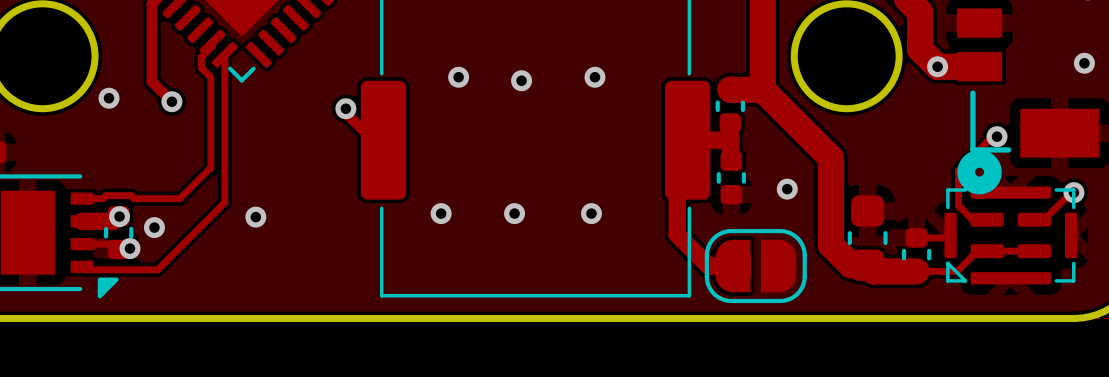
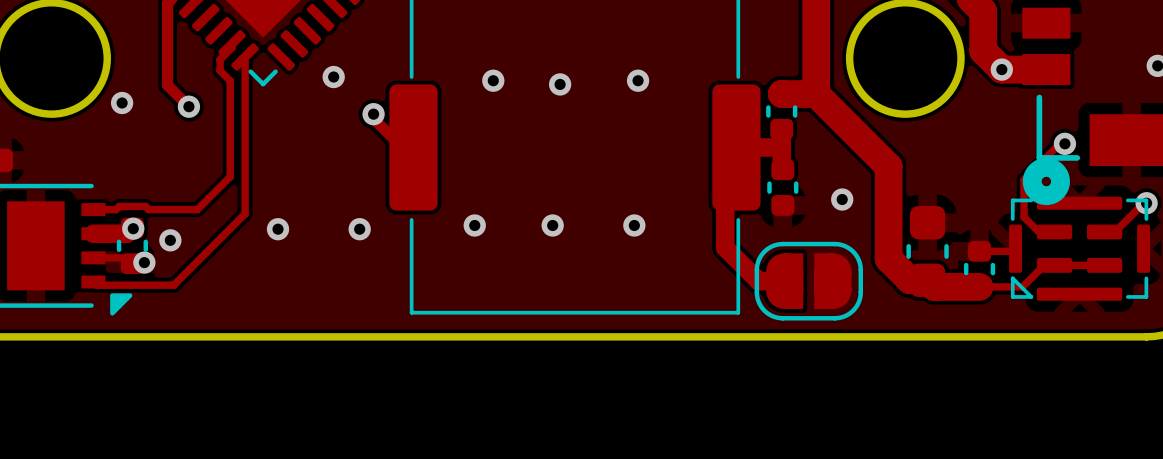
via: none -> (333, 77)
via: none -> (359, 229)

